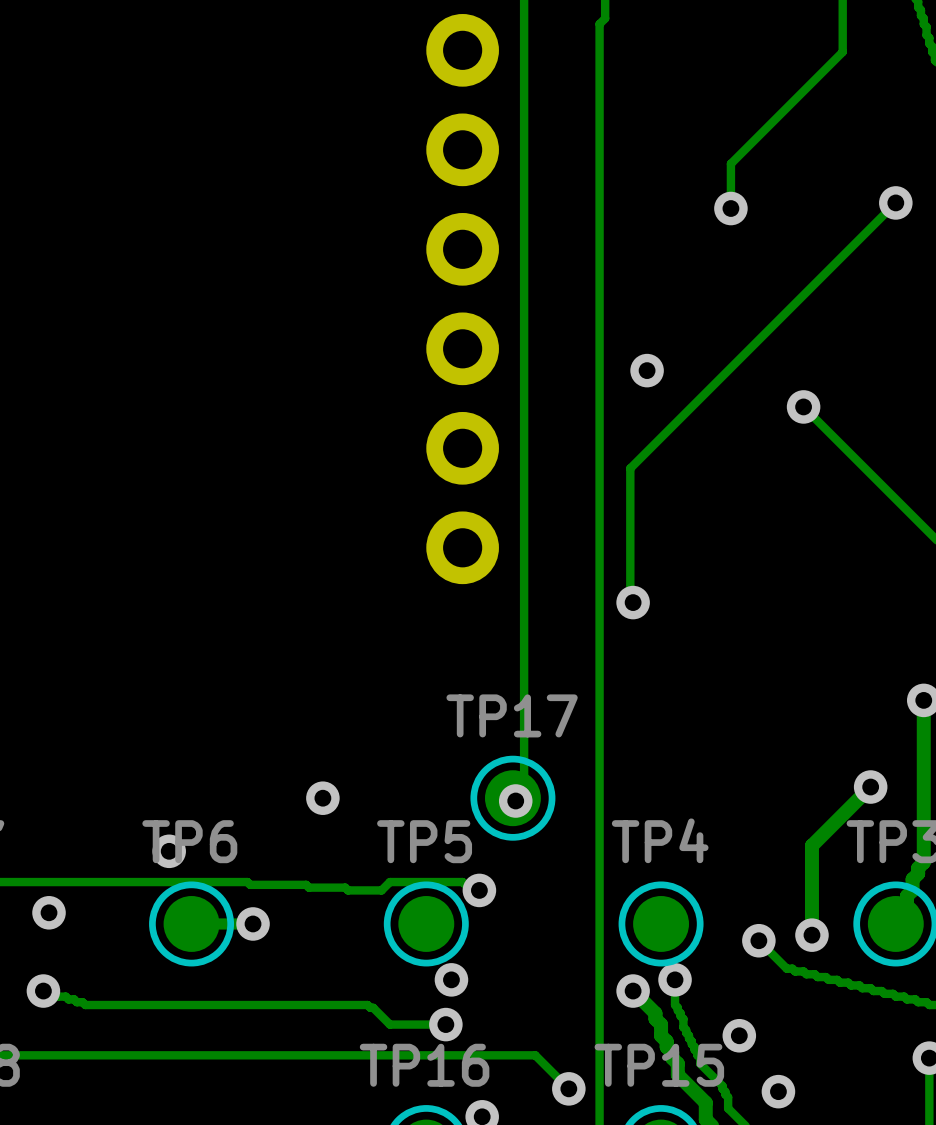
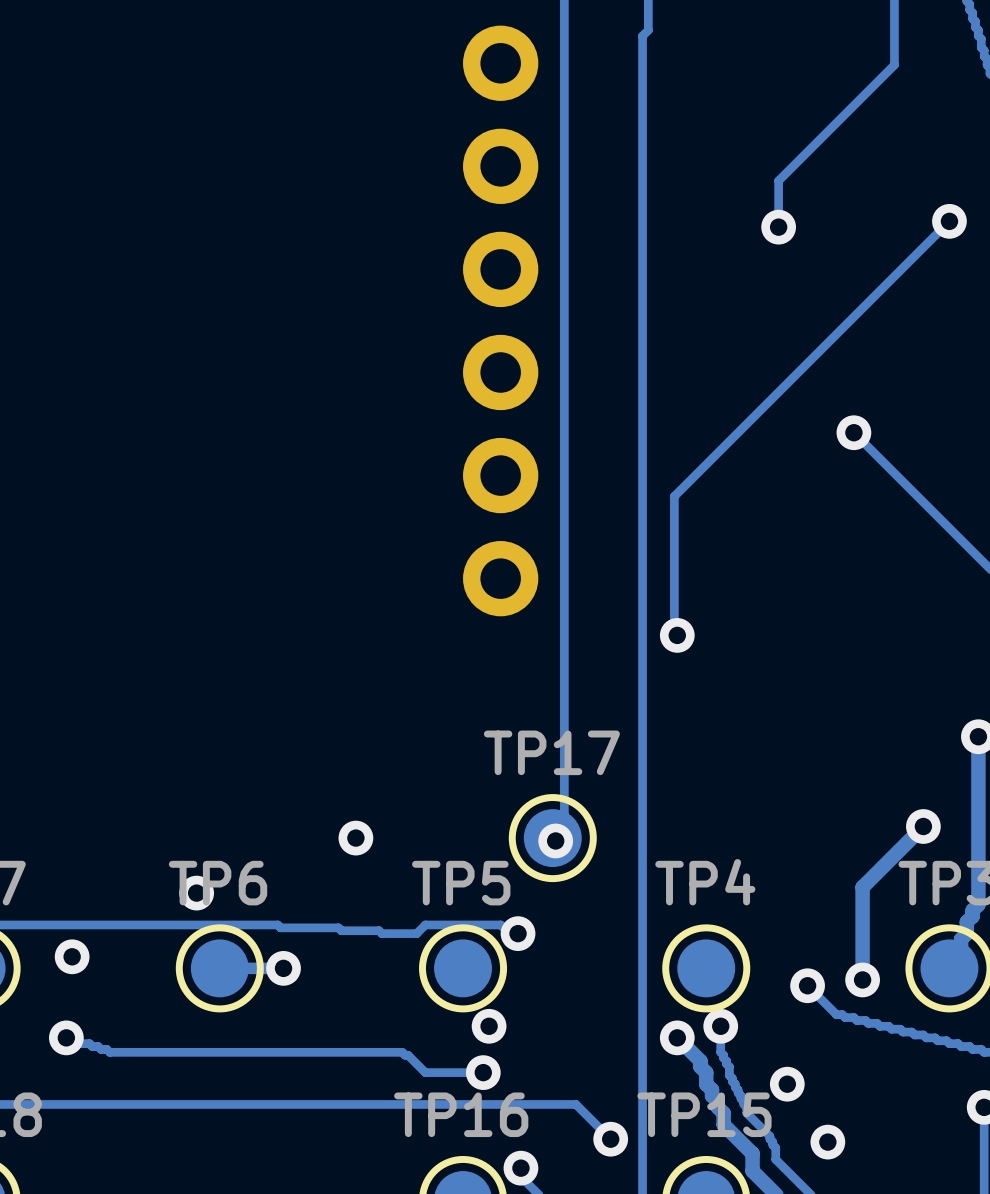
via: (647, 370) -> none

